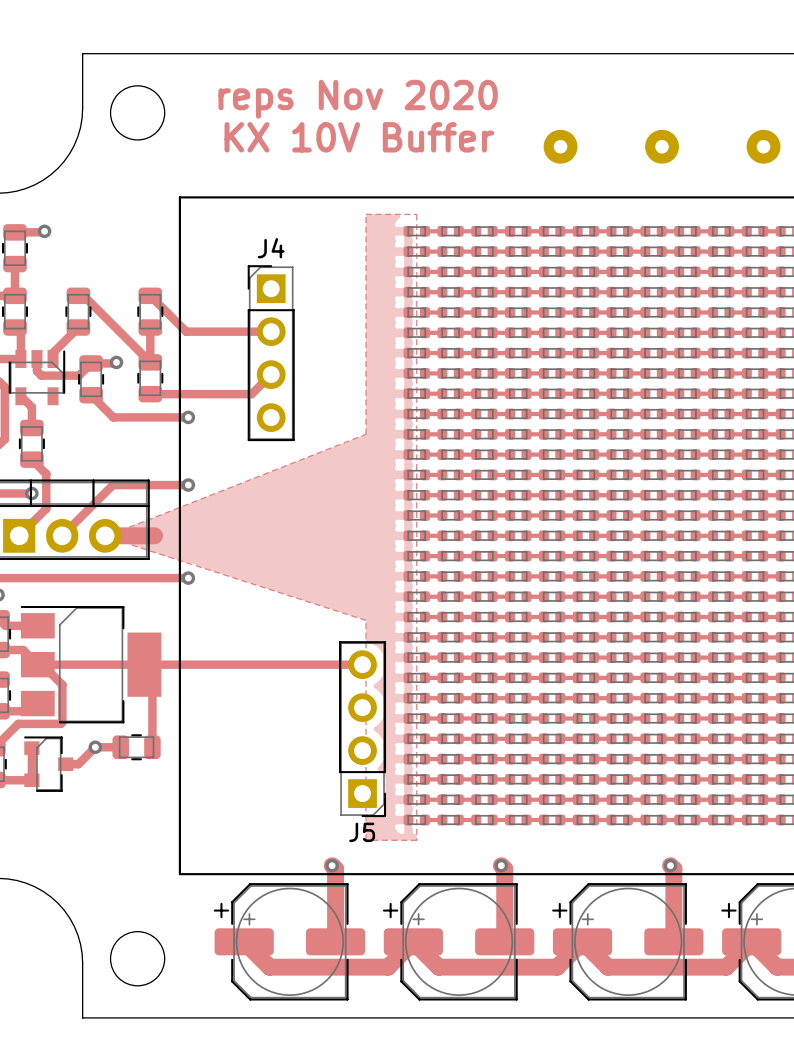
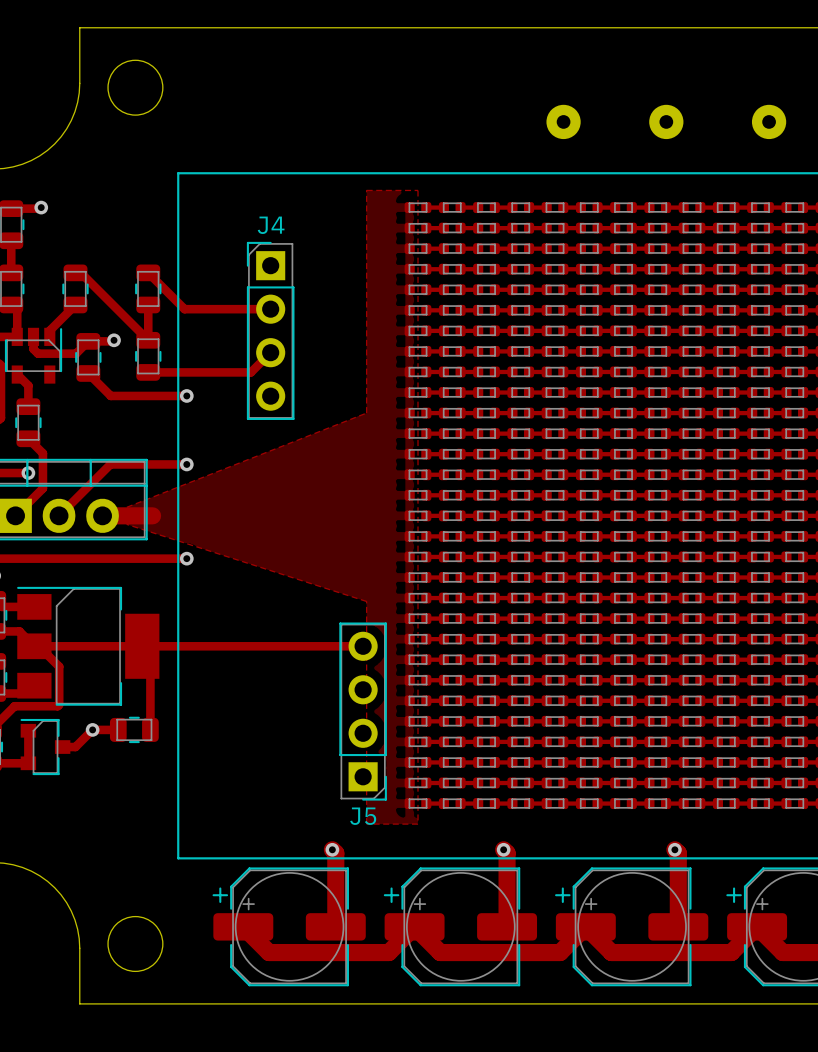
text: reps Nov 2020 (358, 99) -> none
text: KX 10V Buffer (359, 137) -> none

